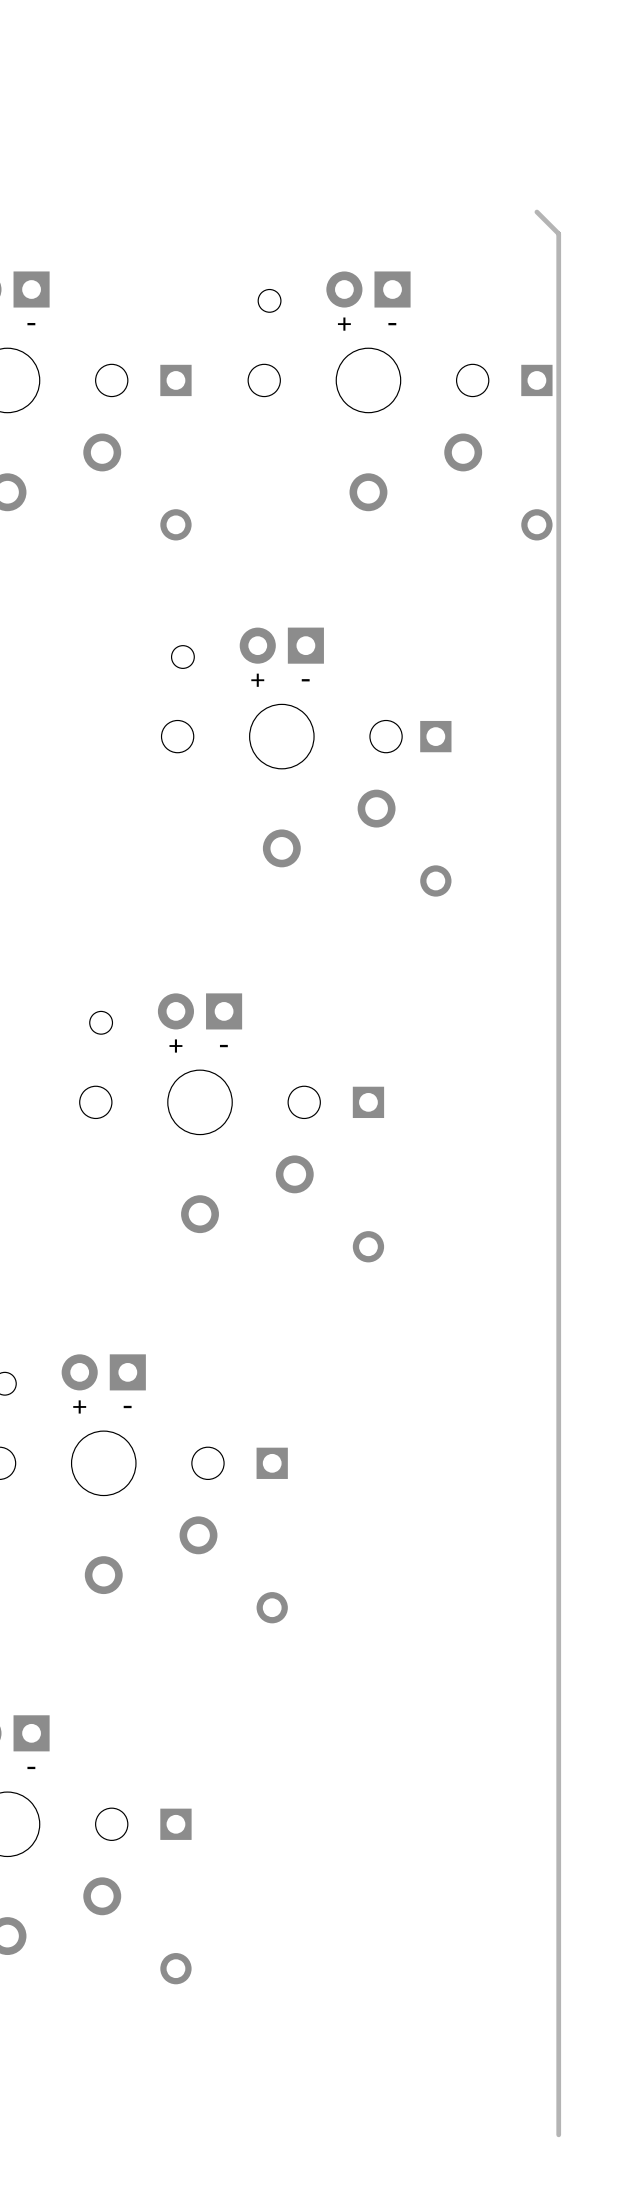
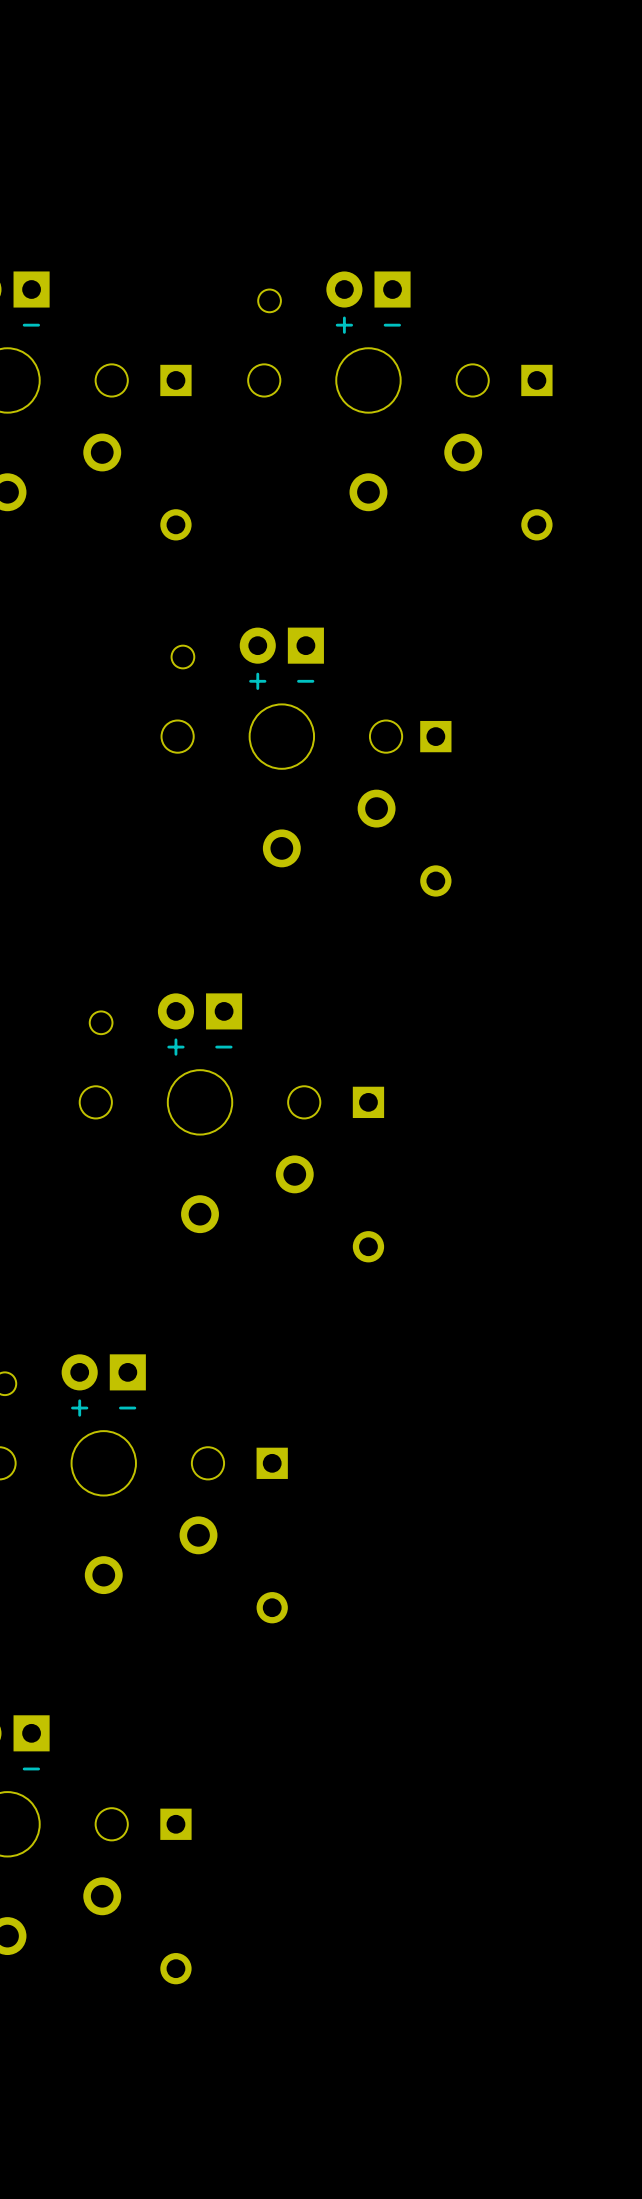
track: (536, 212) (558, 233) (558, 2134) -> none

